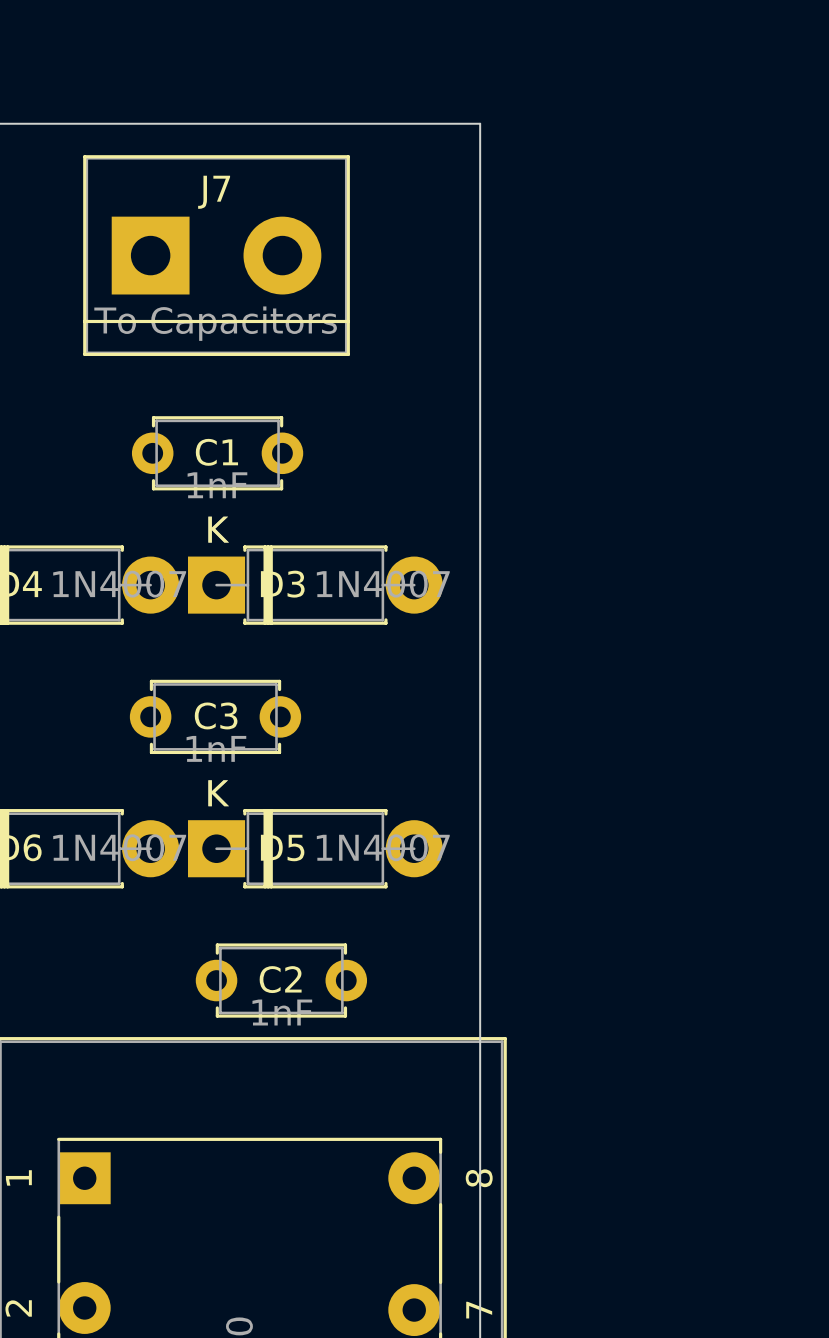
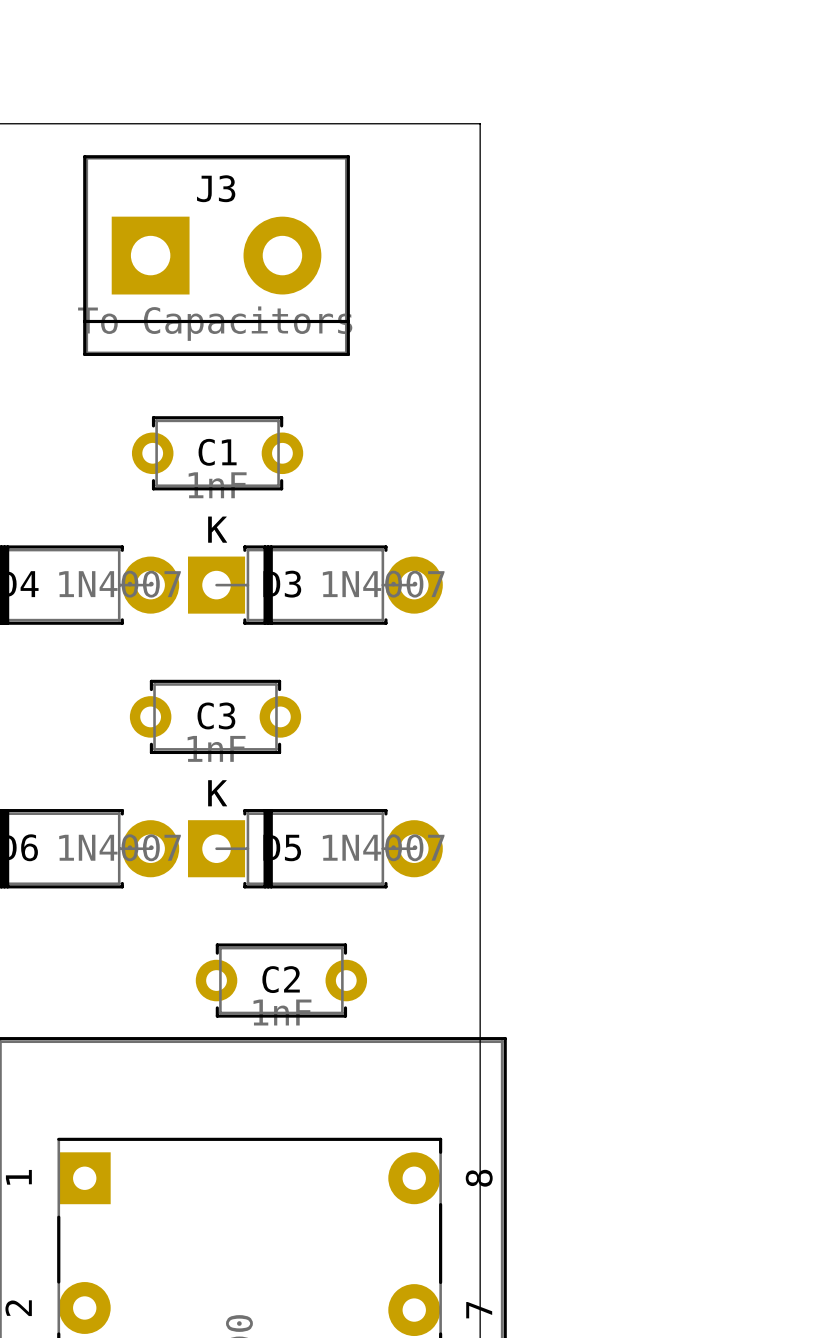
J7 name: J7 (214, 192) -> J3 (216, 188)

